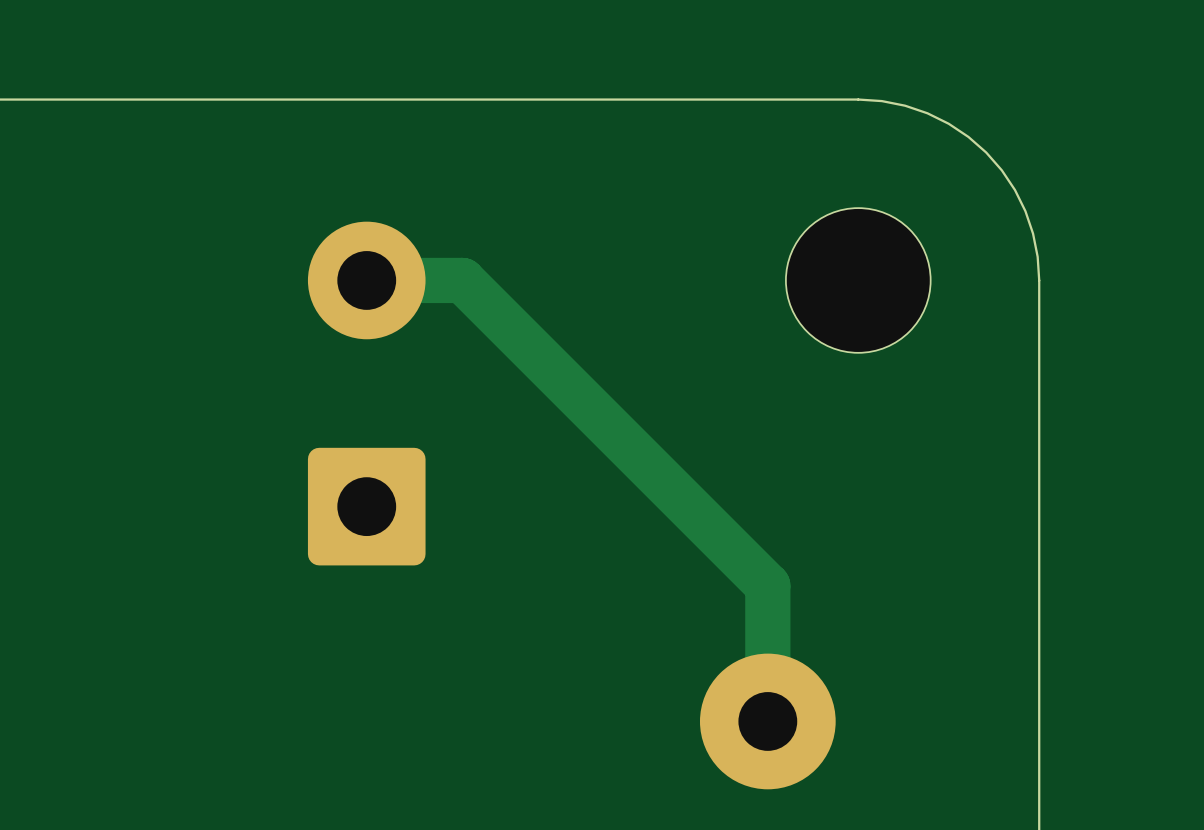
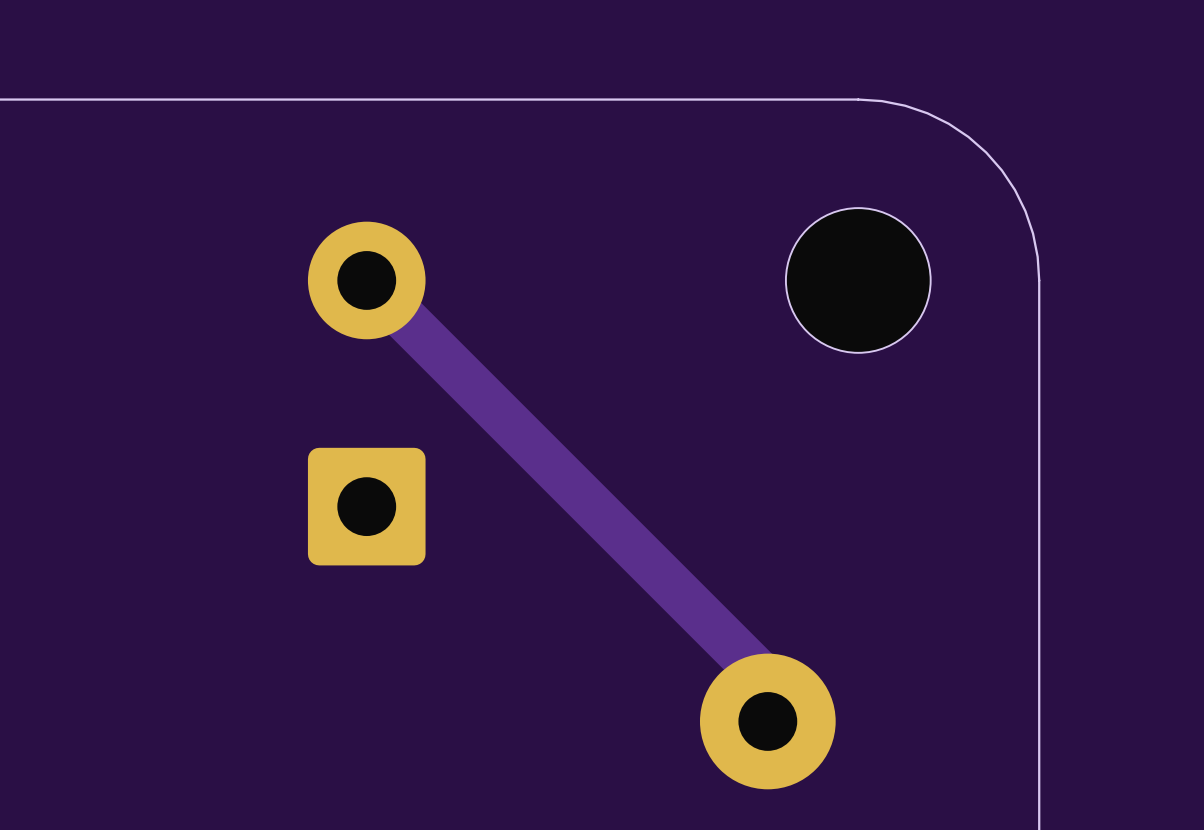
track: (366, 280) (462, 280) (767, 585) (767, 681) -> (366, 280) (767, 681)

